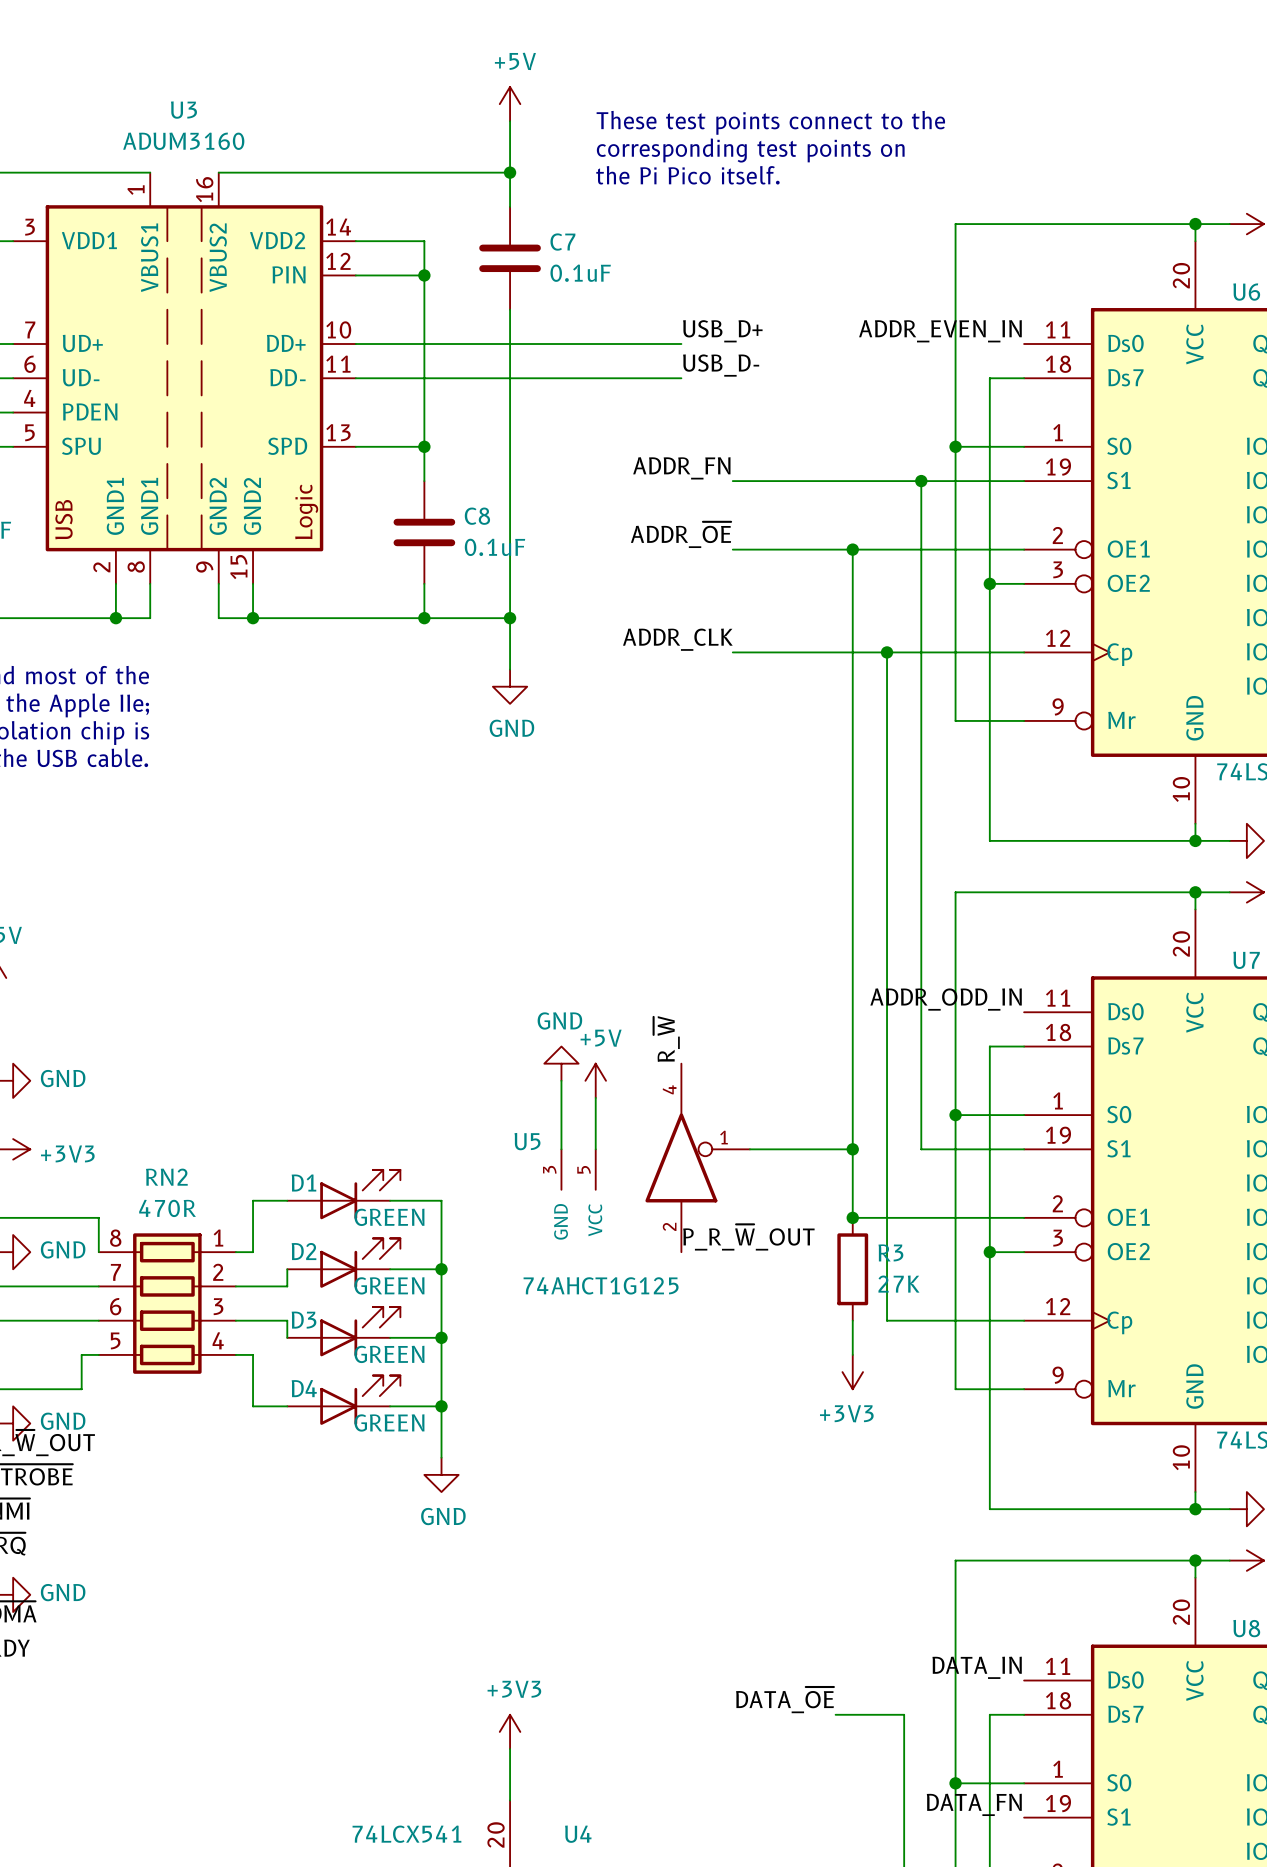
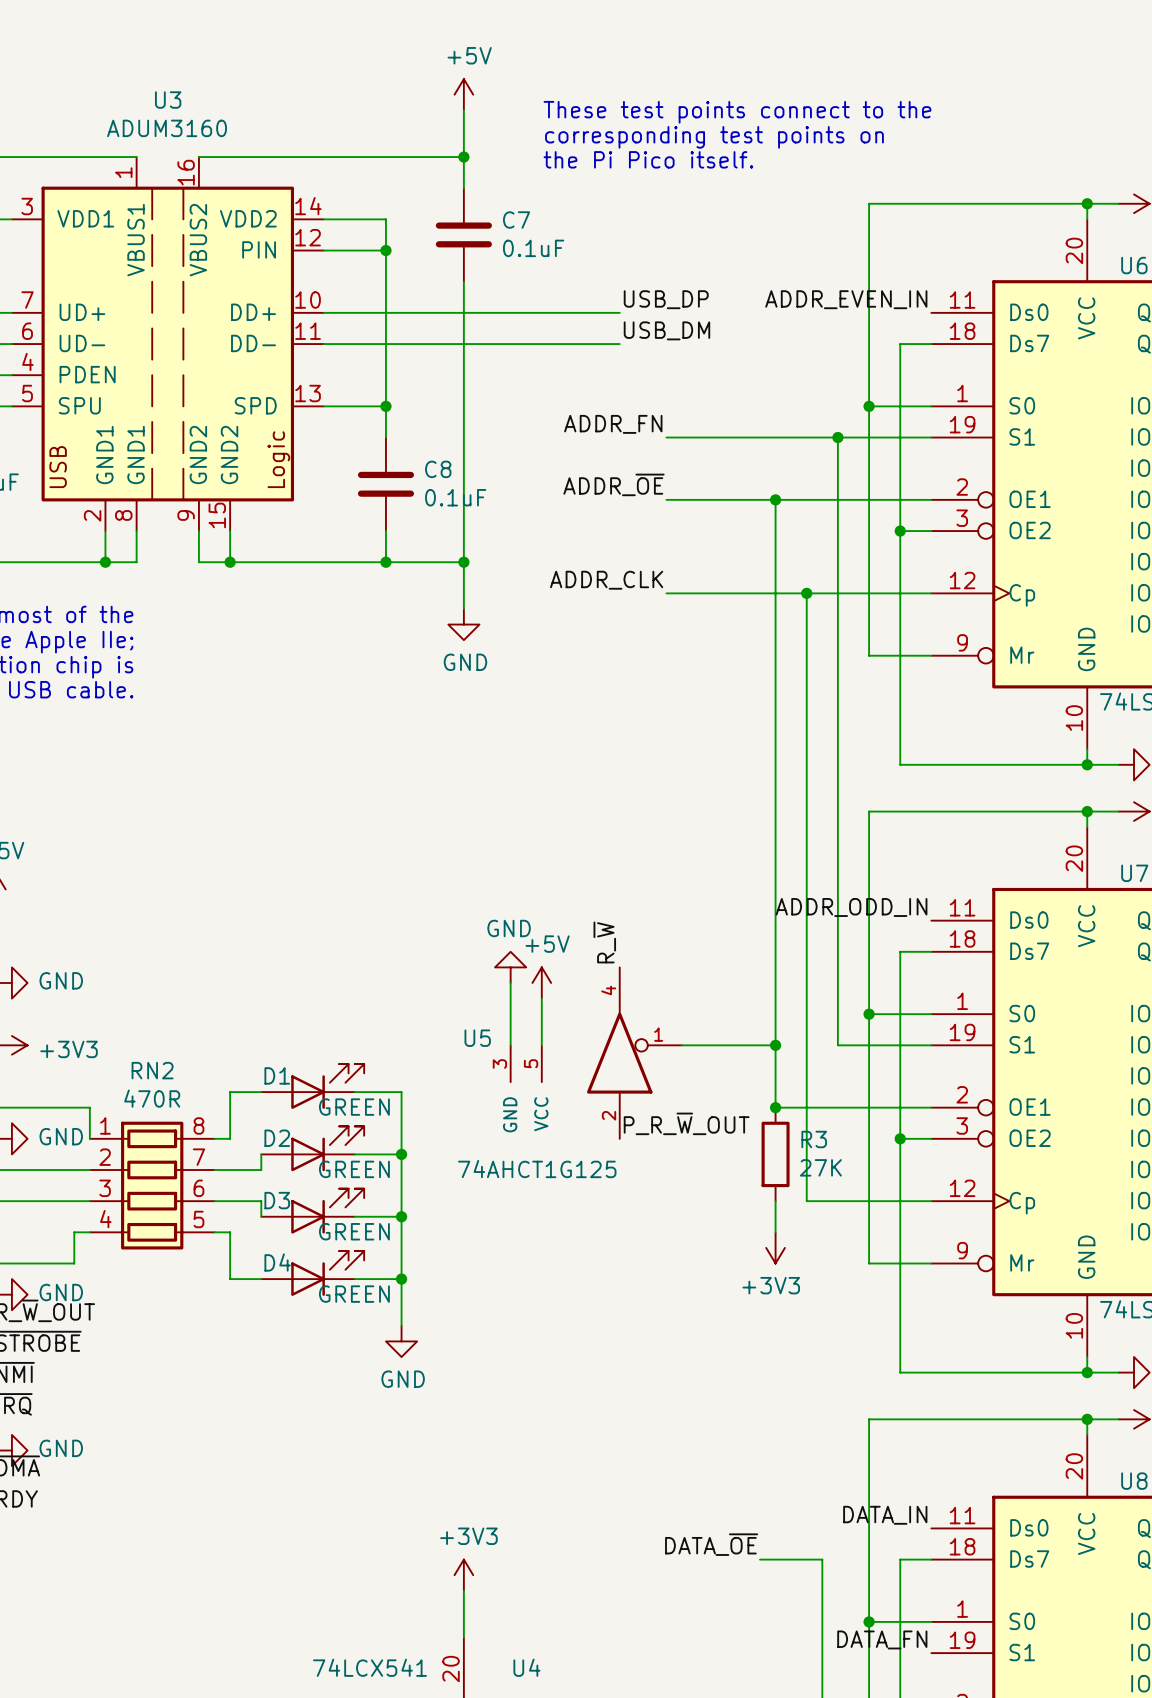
label: USB_D+ (722, 331) -> USB_DP (666, 299)
label: USB_D- (721, 365) -> USB_DM (666, 330)
RN2 flip: as is (167, 1303) -> left-right (152, 1185)

